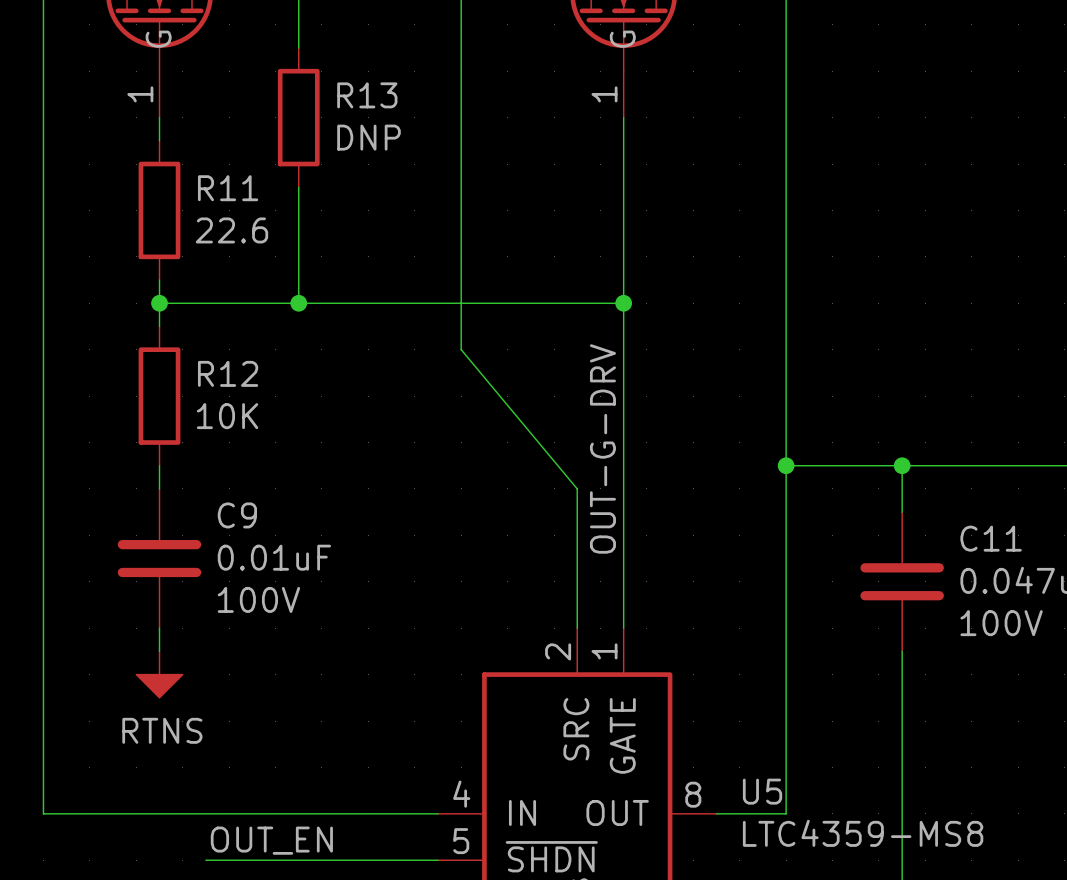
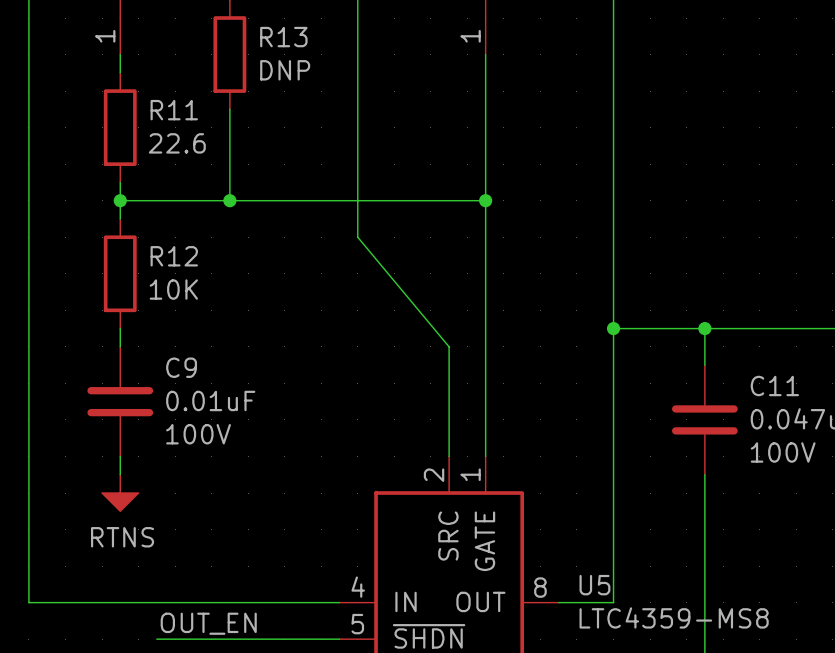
label: OUT-G-DRV (602, 448) -> none

